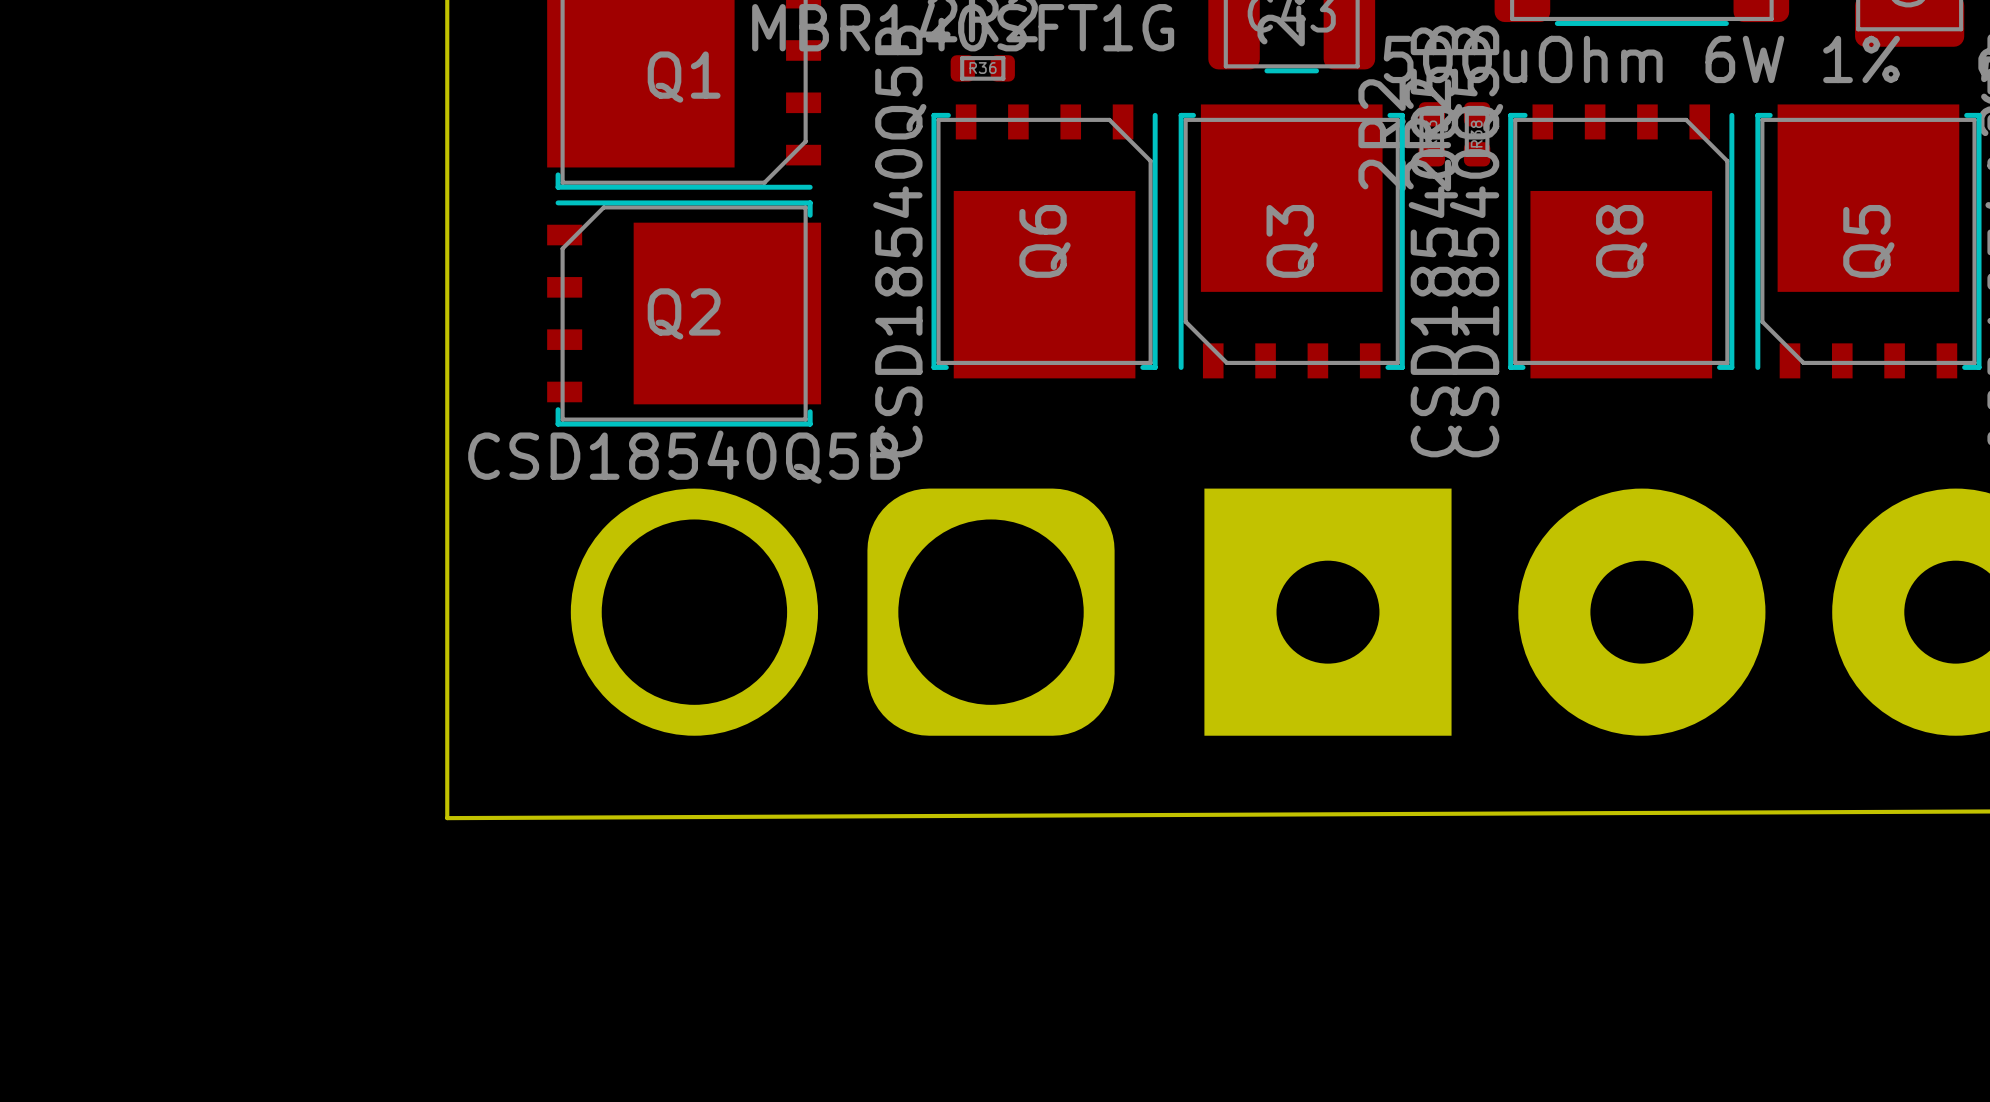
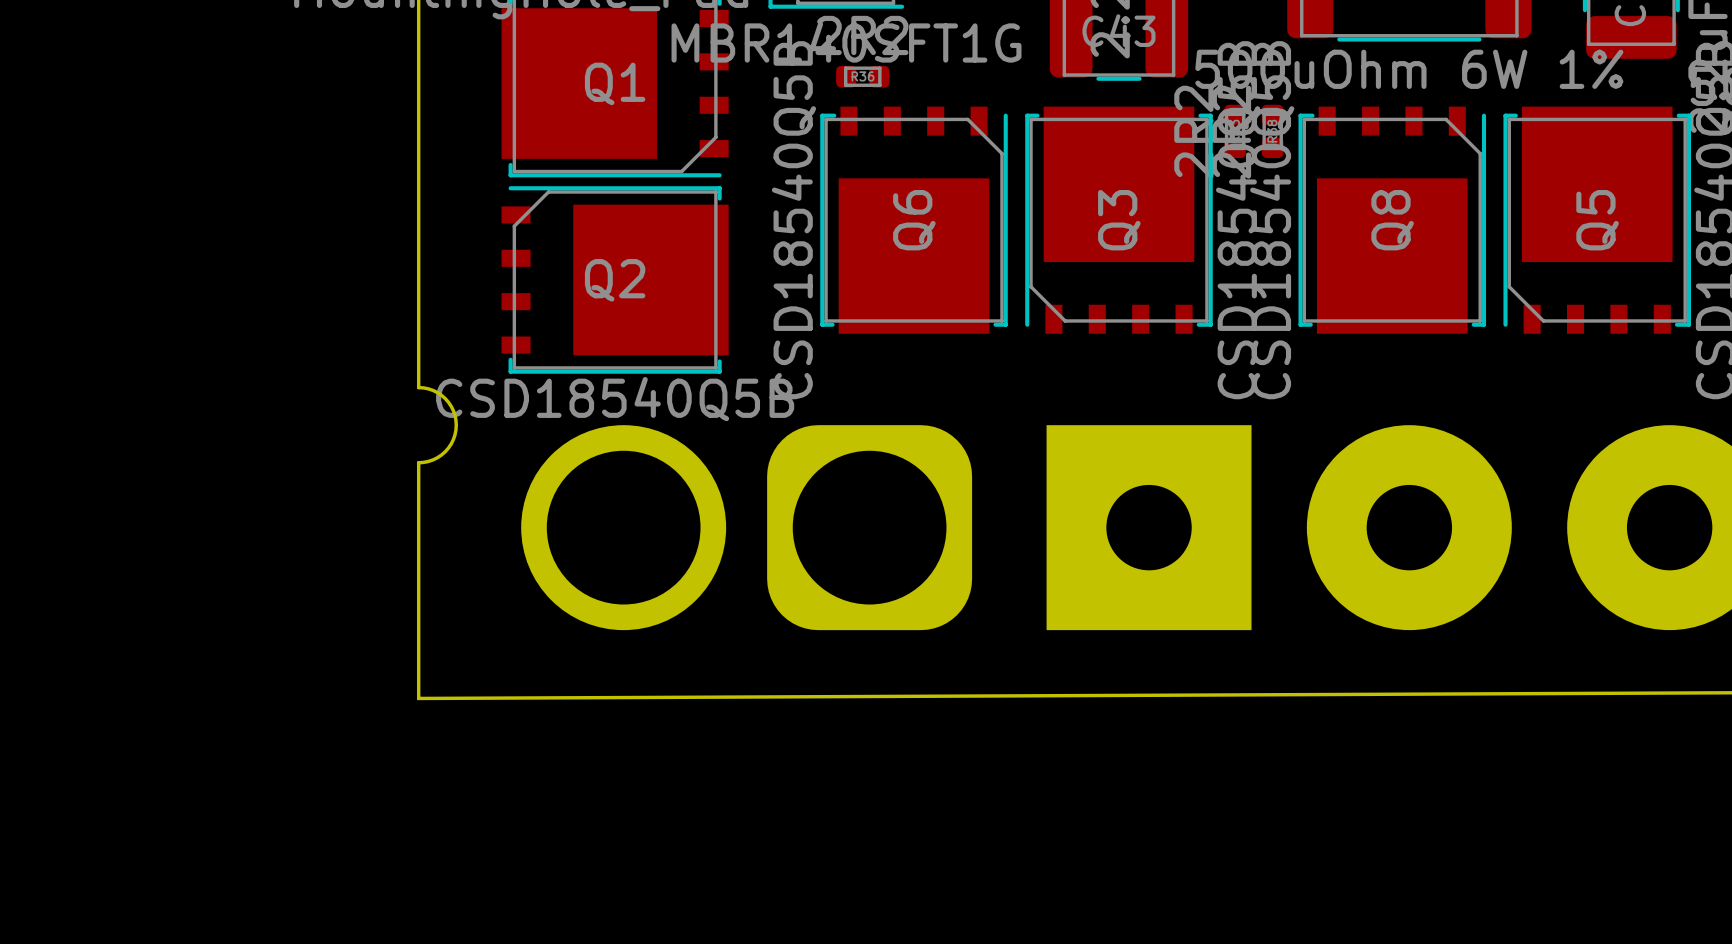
board edge: (447, 443) (447, 533) -> (418, 387) (433, 390) (445, 398) (453, 410) (456, 425) (453, 439) (445, 451) (433, 459) (418, 462)

